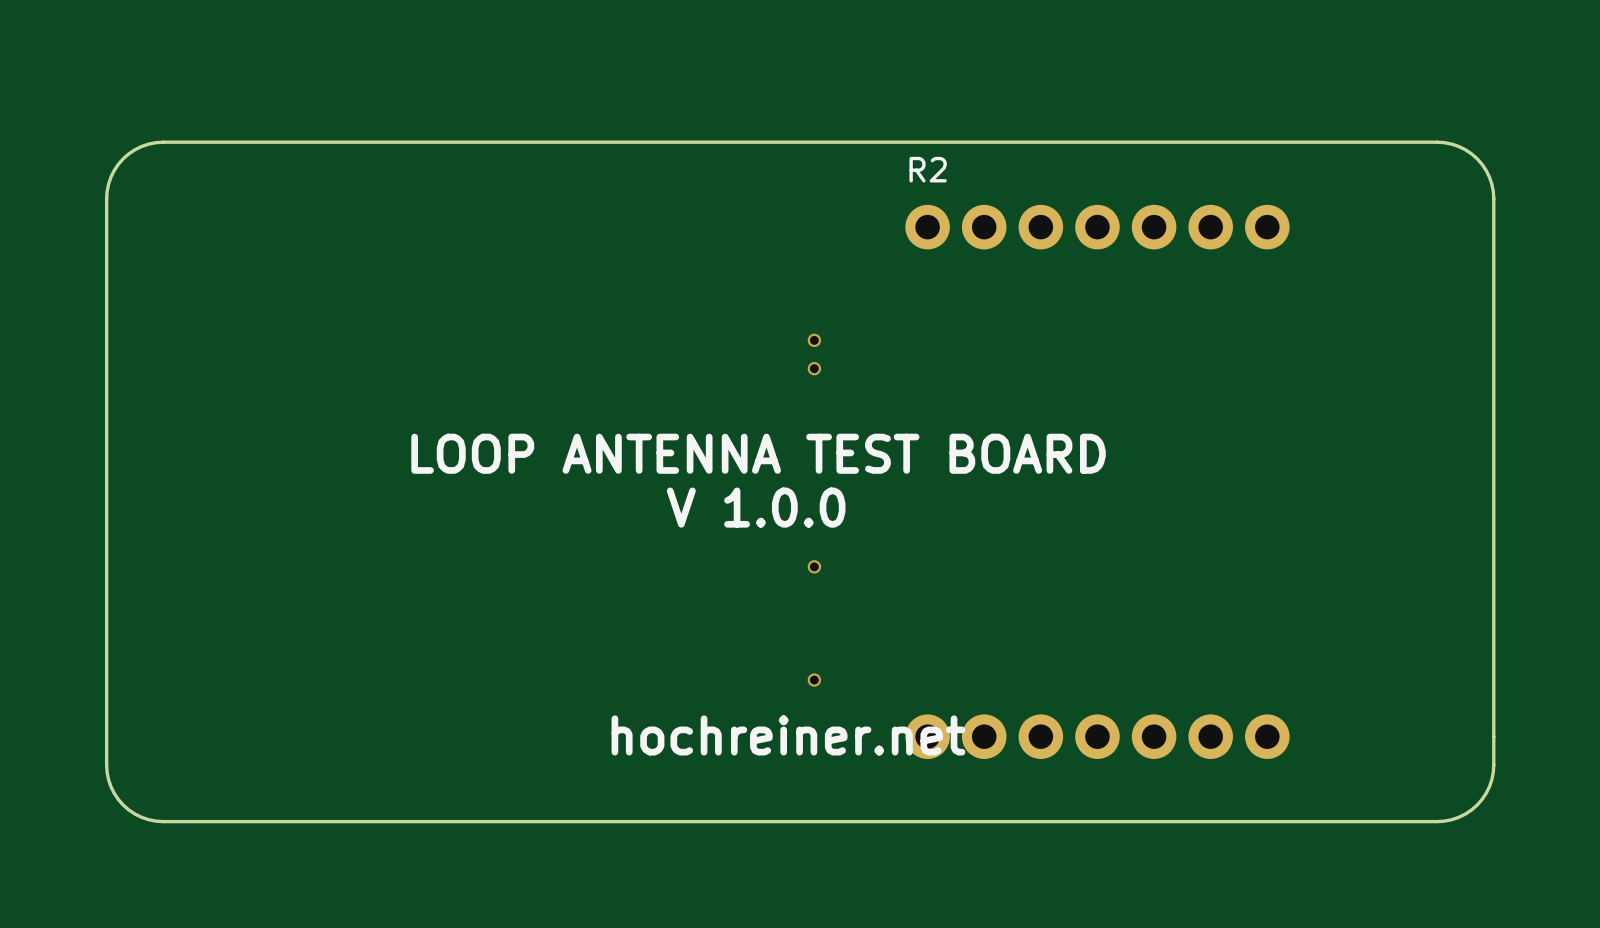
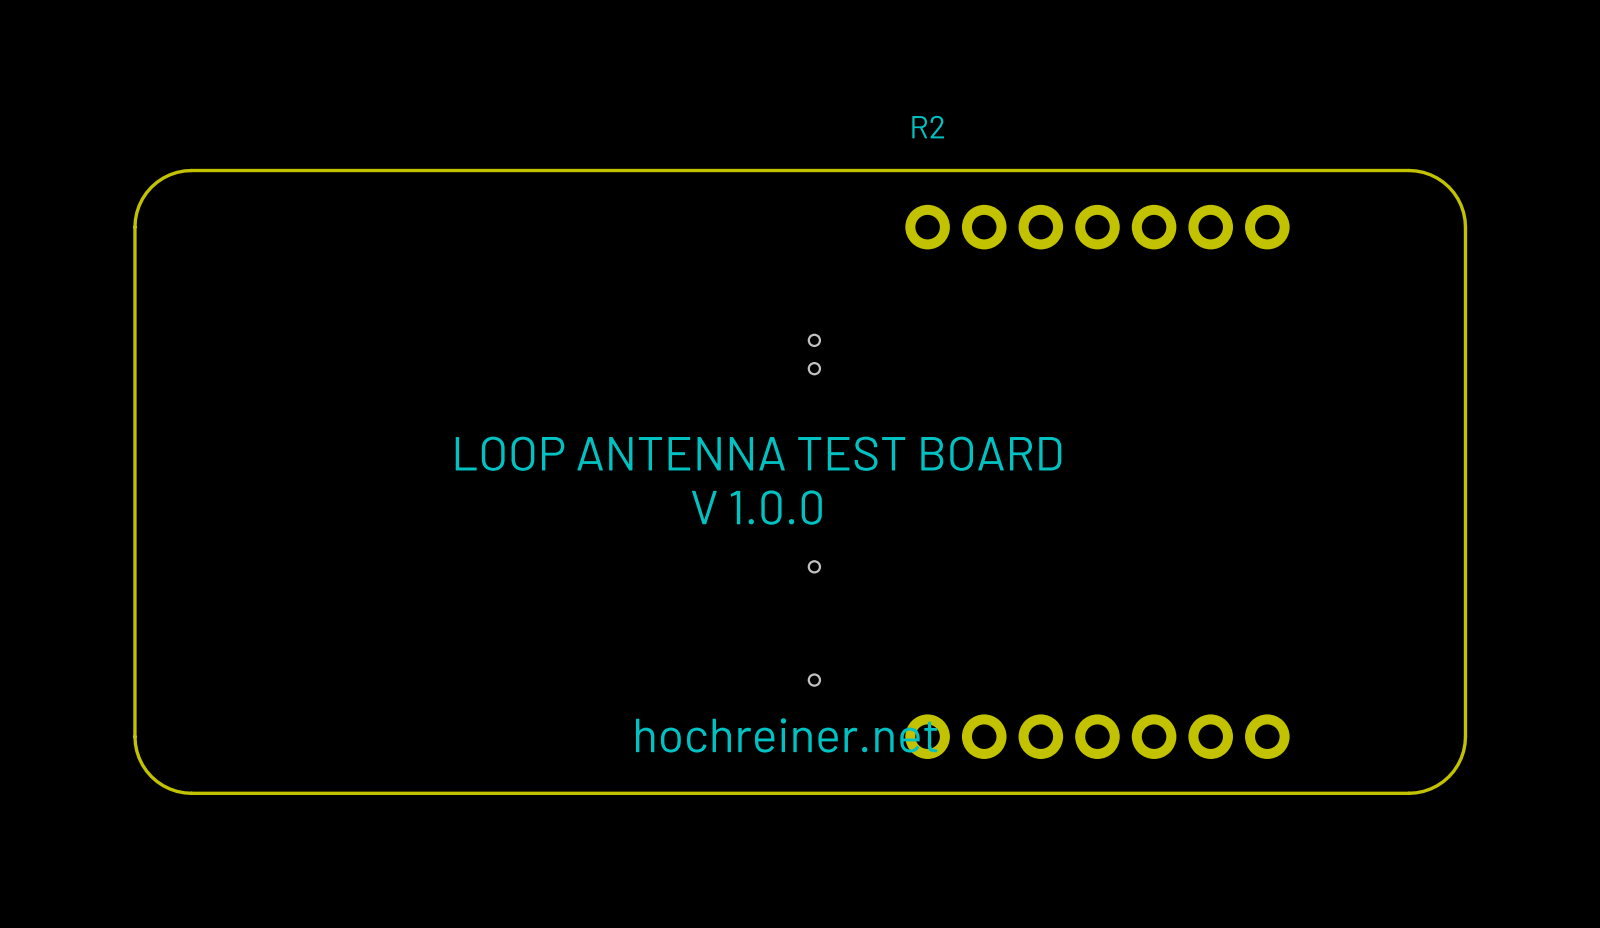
board edge: (1437, 142) (163, 142) (141, 146) (123, 158) (114, 170) (108, 184) (106, 198) (106, 765) (110, 786) (118, 799) (134, 814) (148, 819) (163, 821) (1437, 821) (1458, 817) (1471, 809) (1486, 793) (1491, 779) (1493, 765) (1493, 198) (1489, 177) (1477, 158) (1458, 146) (1437, 142) -> (1408, 170) (191, 170) (169, 174) (157, 182) (146, 192) (136, 212) (134, 227) (134, 736) (139, 758) (146, 771) (163, 785) (176, 791) (191, 793) (1408, 793) (1430, 788) (1443, 781) (1453, 771) (1463, 751) (1465, 736) (1465, 227) (1461, 205) (1448, 187) (1430, 174) (1408, 170)
R2 name position: R2 (928, 169) -> R2 (928, 127)

